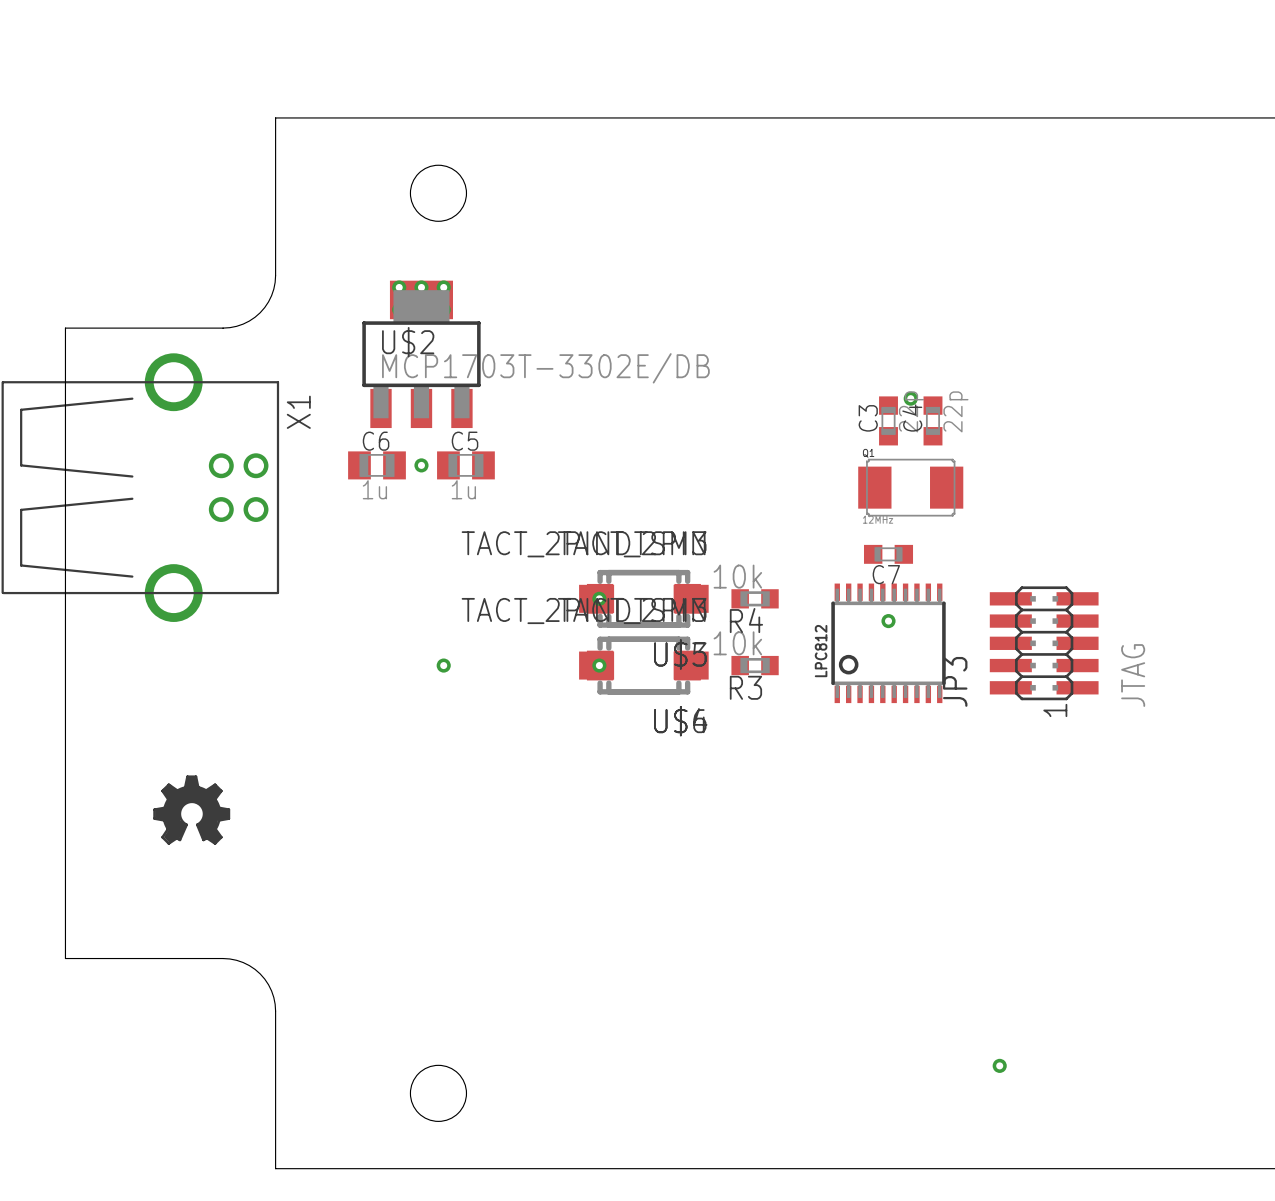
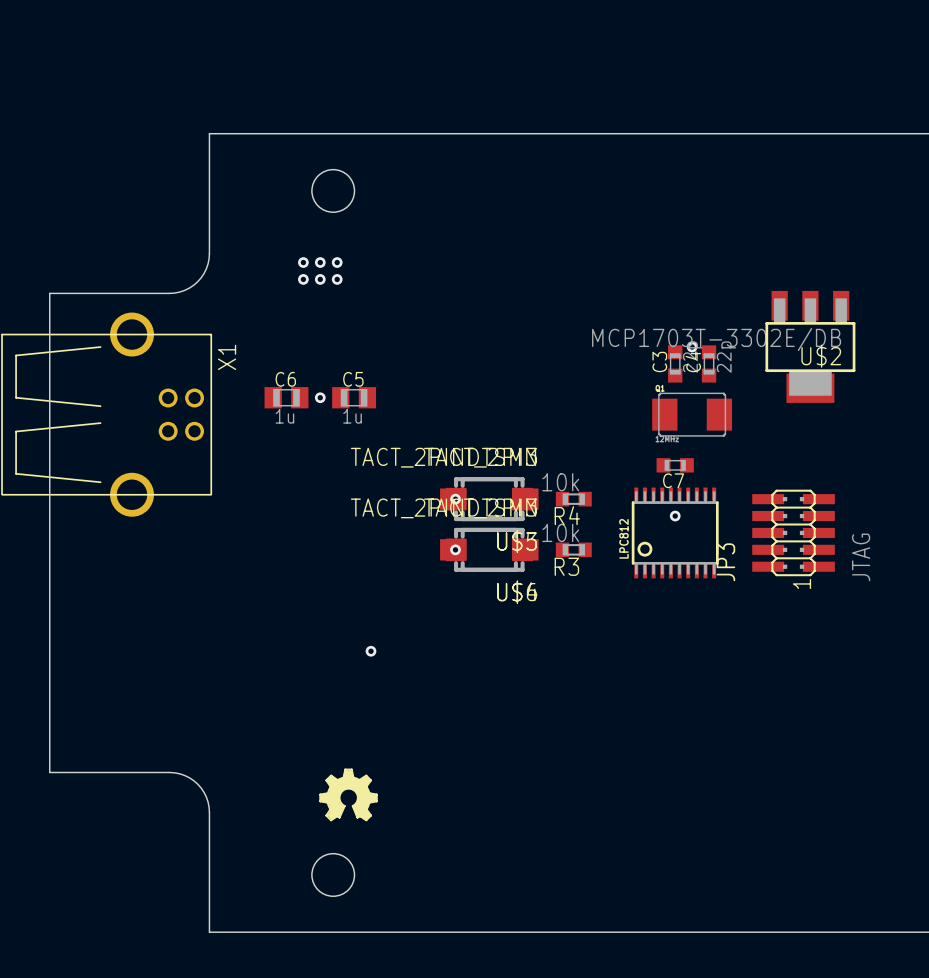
U$2 rotation: 0° (421, 354) -> 180° (810, 346)
U$2 position: (421, 354) -> (810, 346)
via: (443, 665) -> none
via: none -> (371, 651)
drawing position: (191, 810) -> (348, 794)
via: (999, 1065) -> none

